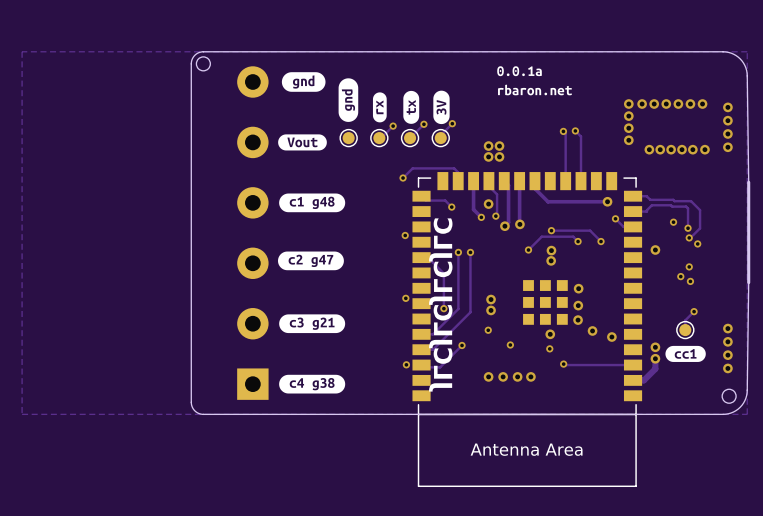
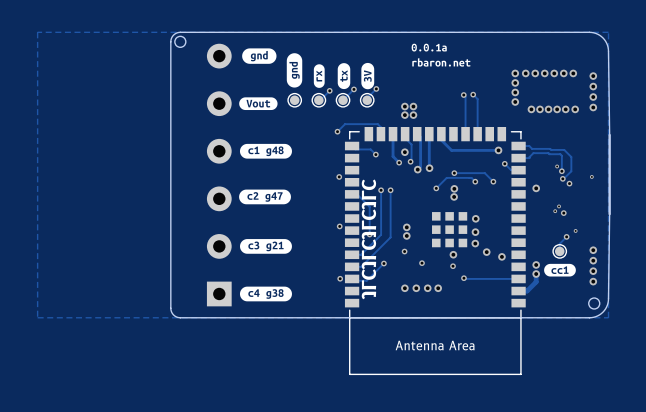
via: (673, 222) -> none
via: none -> (557, 166)
via: none -> (591, 176)
via: (689, 266) -> none
via: none -> (559, 206)
via: (680, 276) -> none
via: none -> (555, 211)
via: none -> (575, 230)

